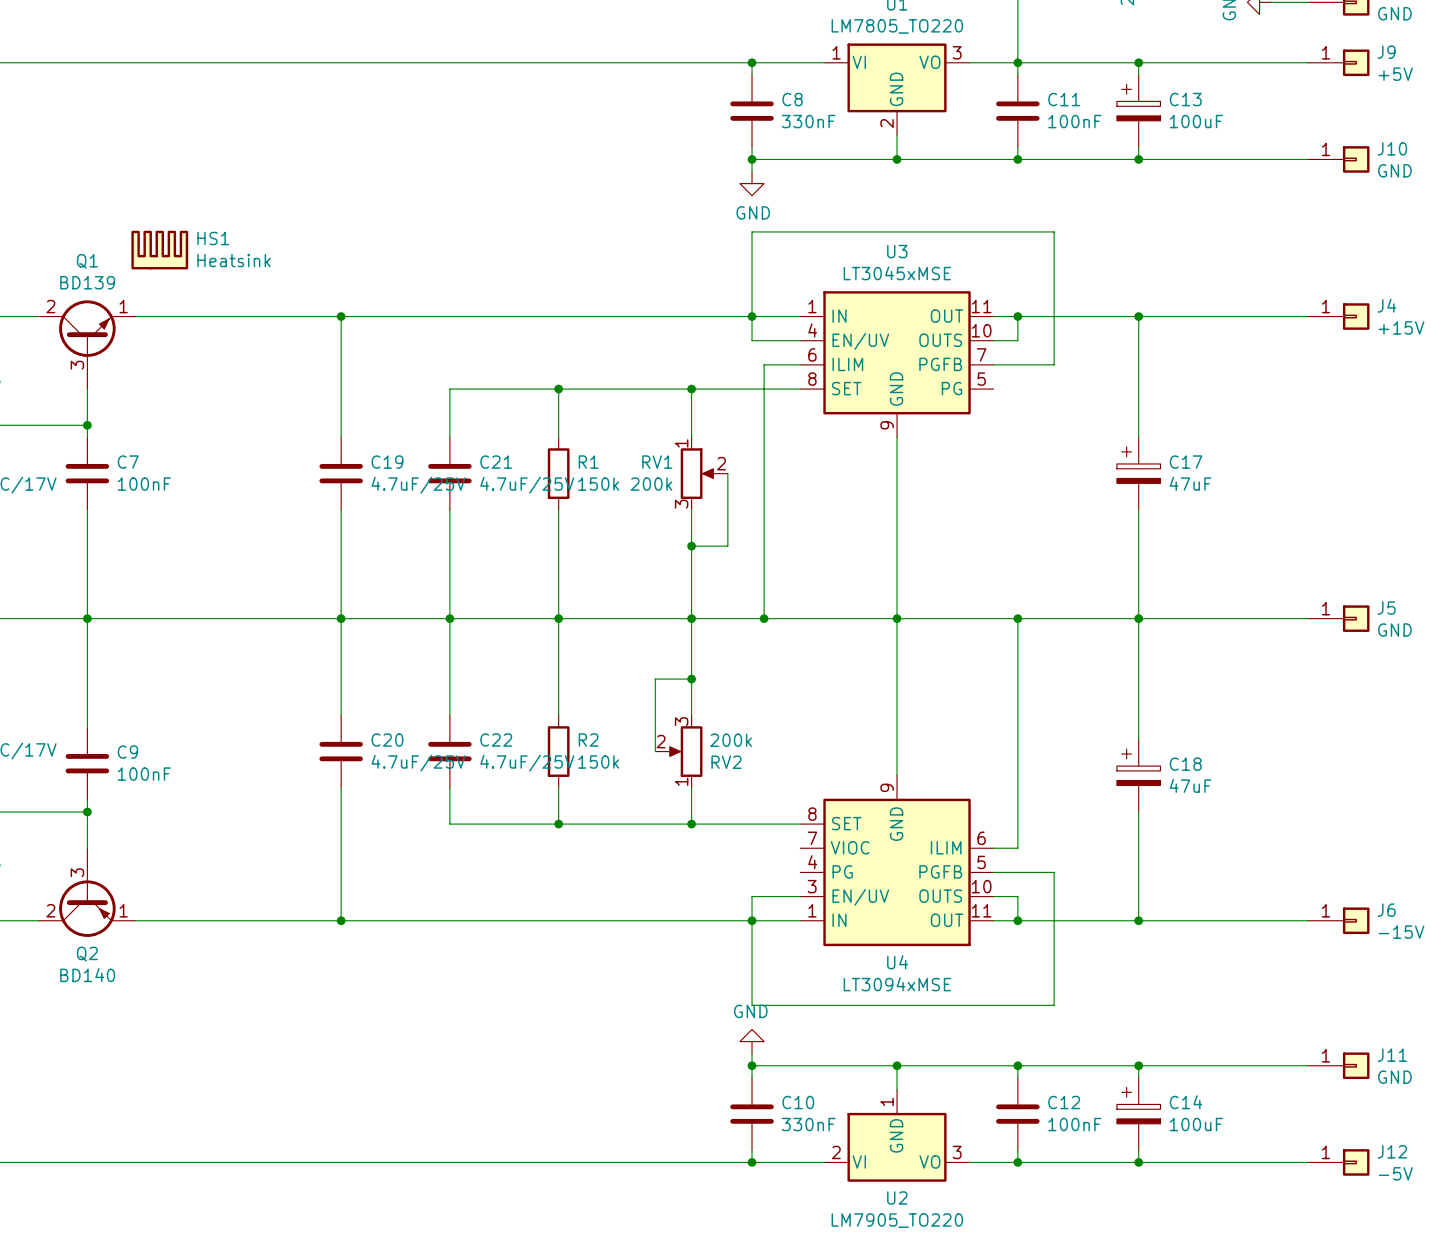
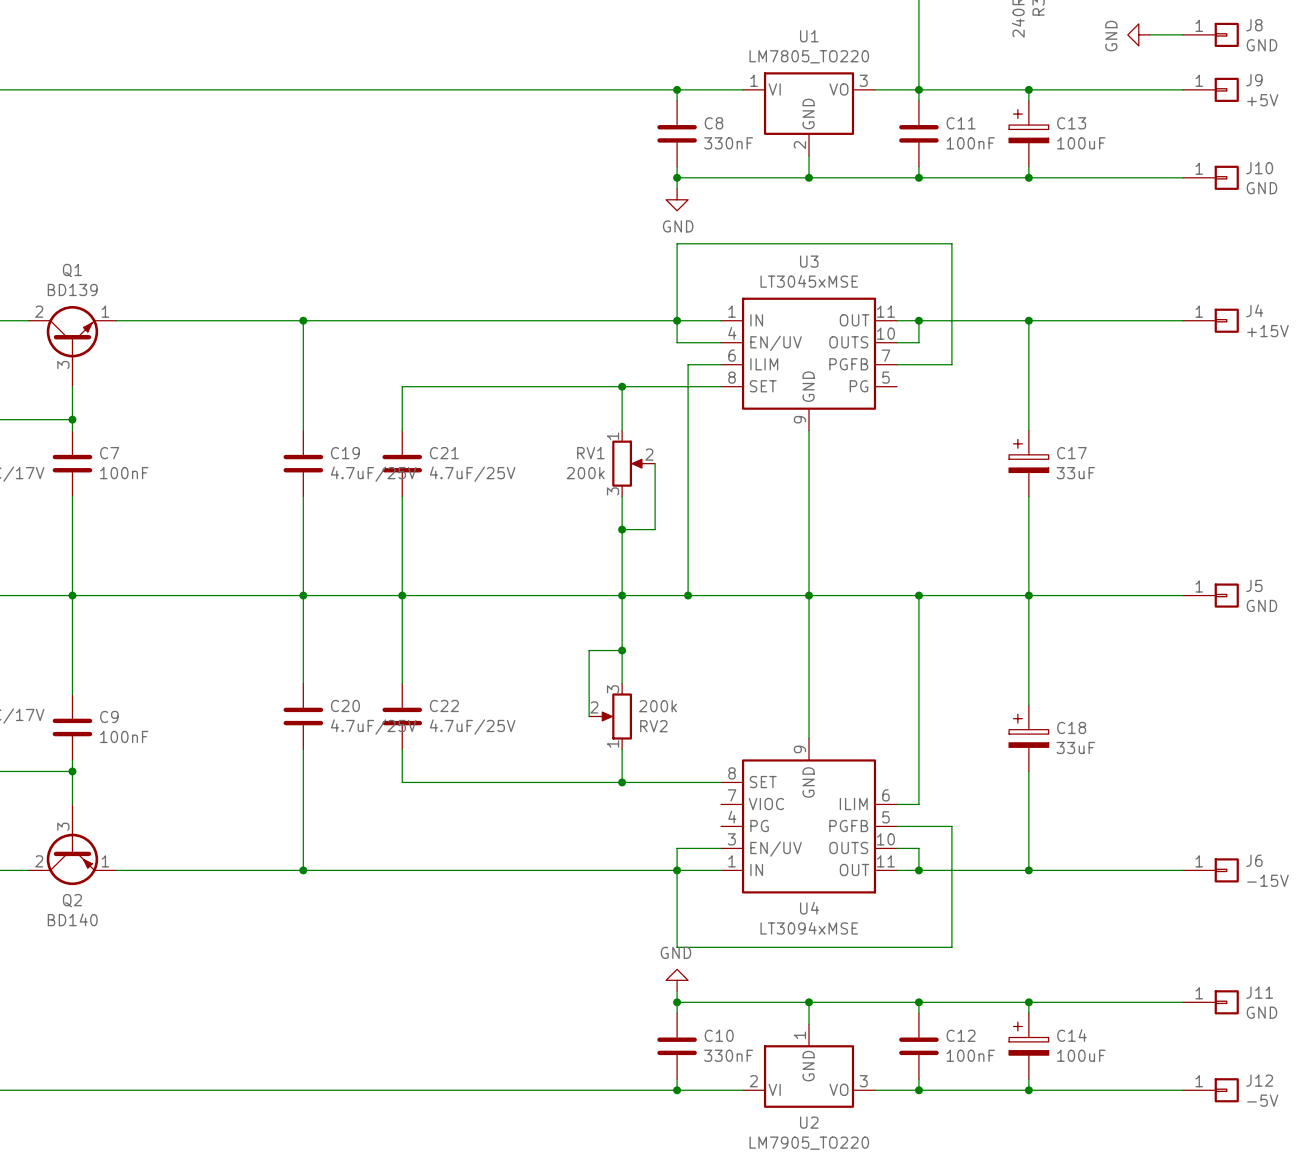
HS1: Heatsink (159, 250) -> none
wire: (558, 389) (558, 437) -> none
junction: (558, 389) -> none
R1: 150k (558, 473) -> none
C17 value: 47uF (1190, 483) -> 33uF (1075, 473)
wire: (558, 509) (558, 715) -> none
junction: (558, 618) -> none
R2: 150k (558, 751) -> none
C18 value: 47uF (1190, 785) -> 33uF (1075, 747)
wire: (558, 787) (558, 824) -> none
junction: (558, 824) -> none

